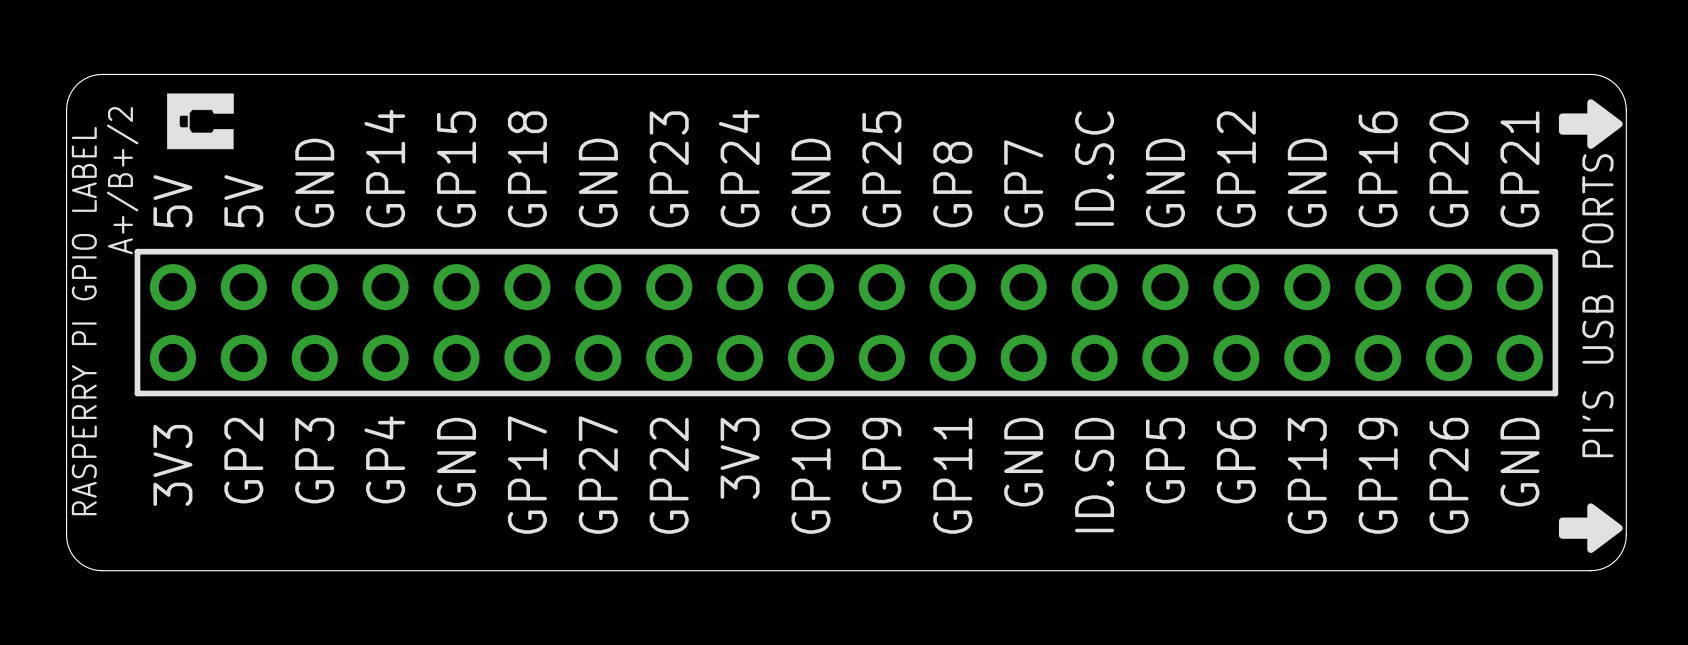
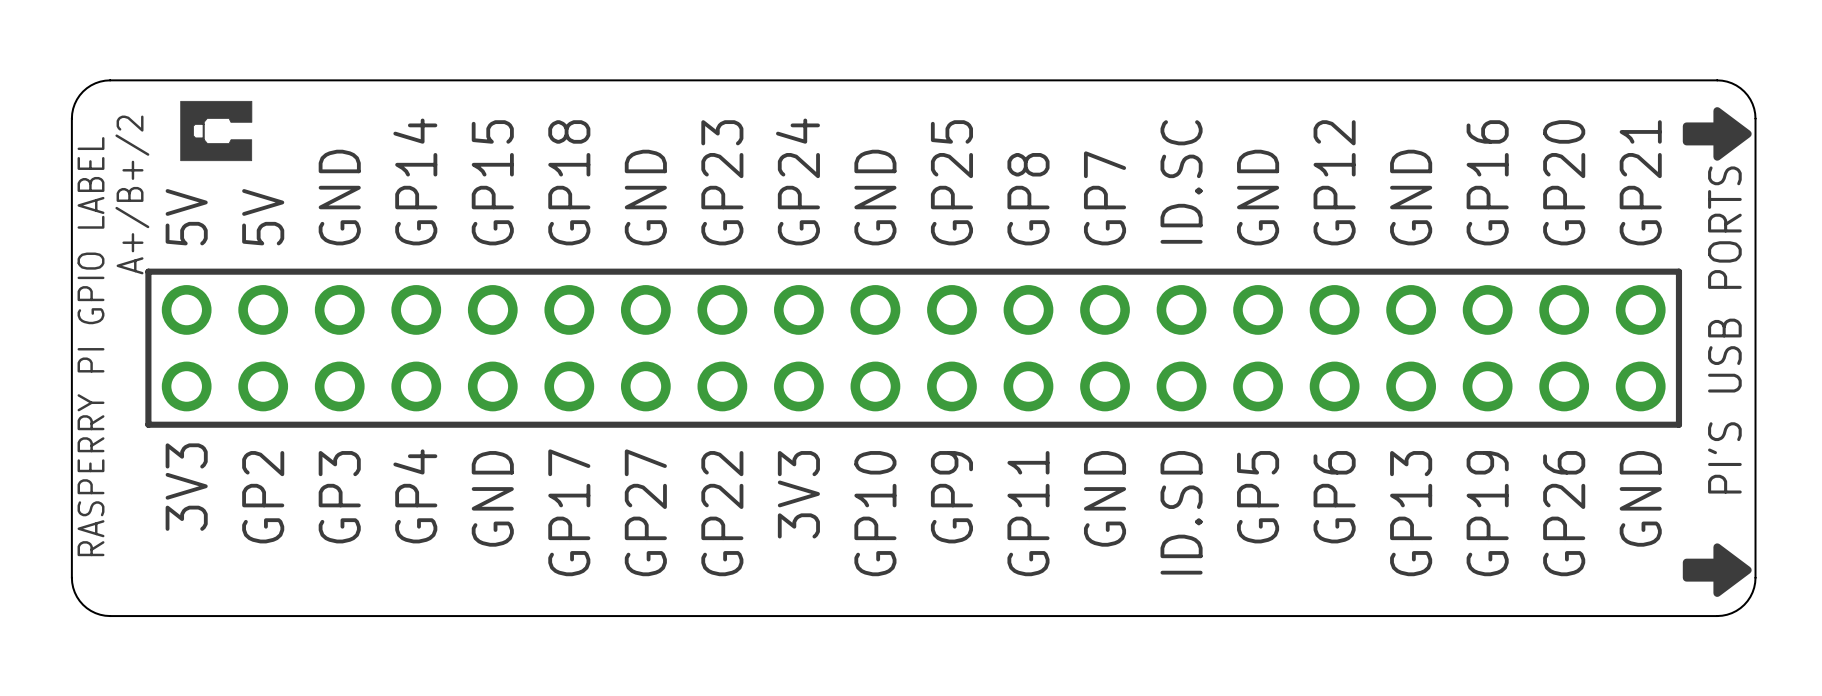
text position: 3V3 (172, 465) -> 3V3 (186, 487)

